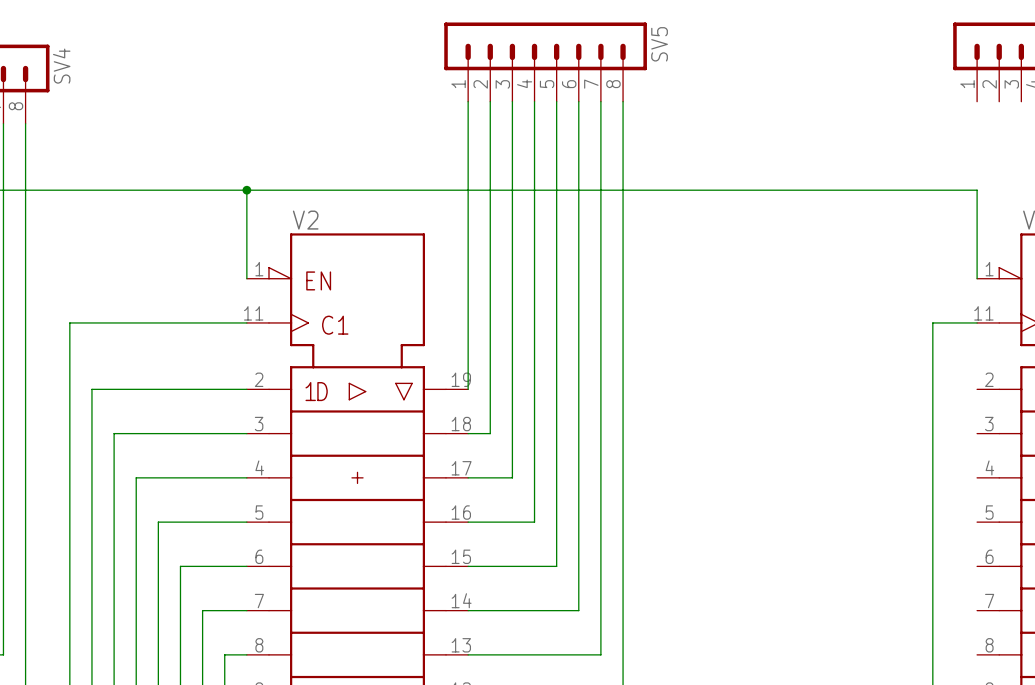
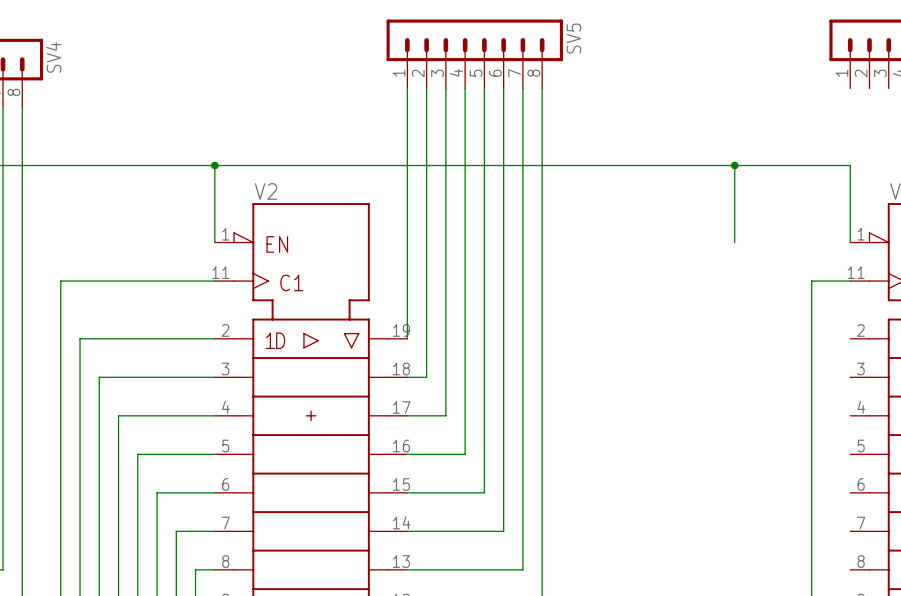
wire: none -> (734, 165) (734, 242)
junction: none -> (734, 165)

